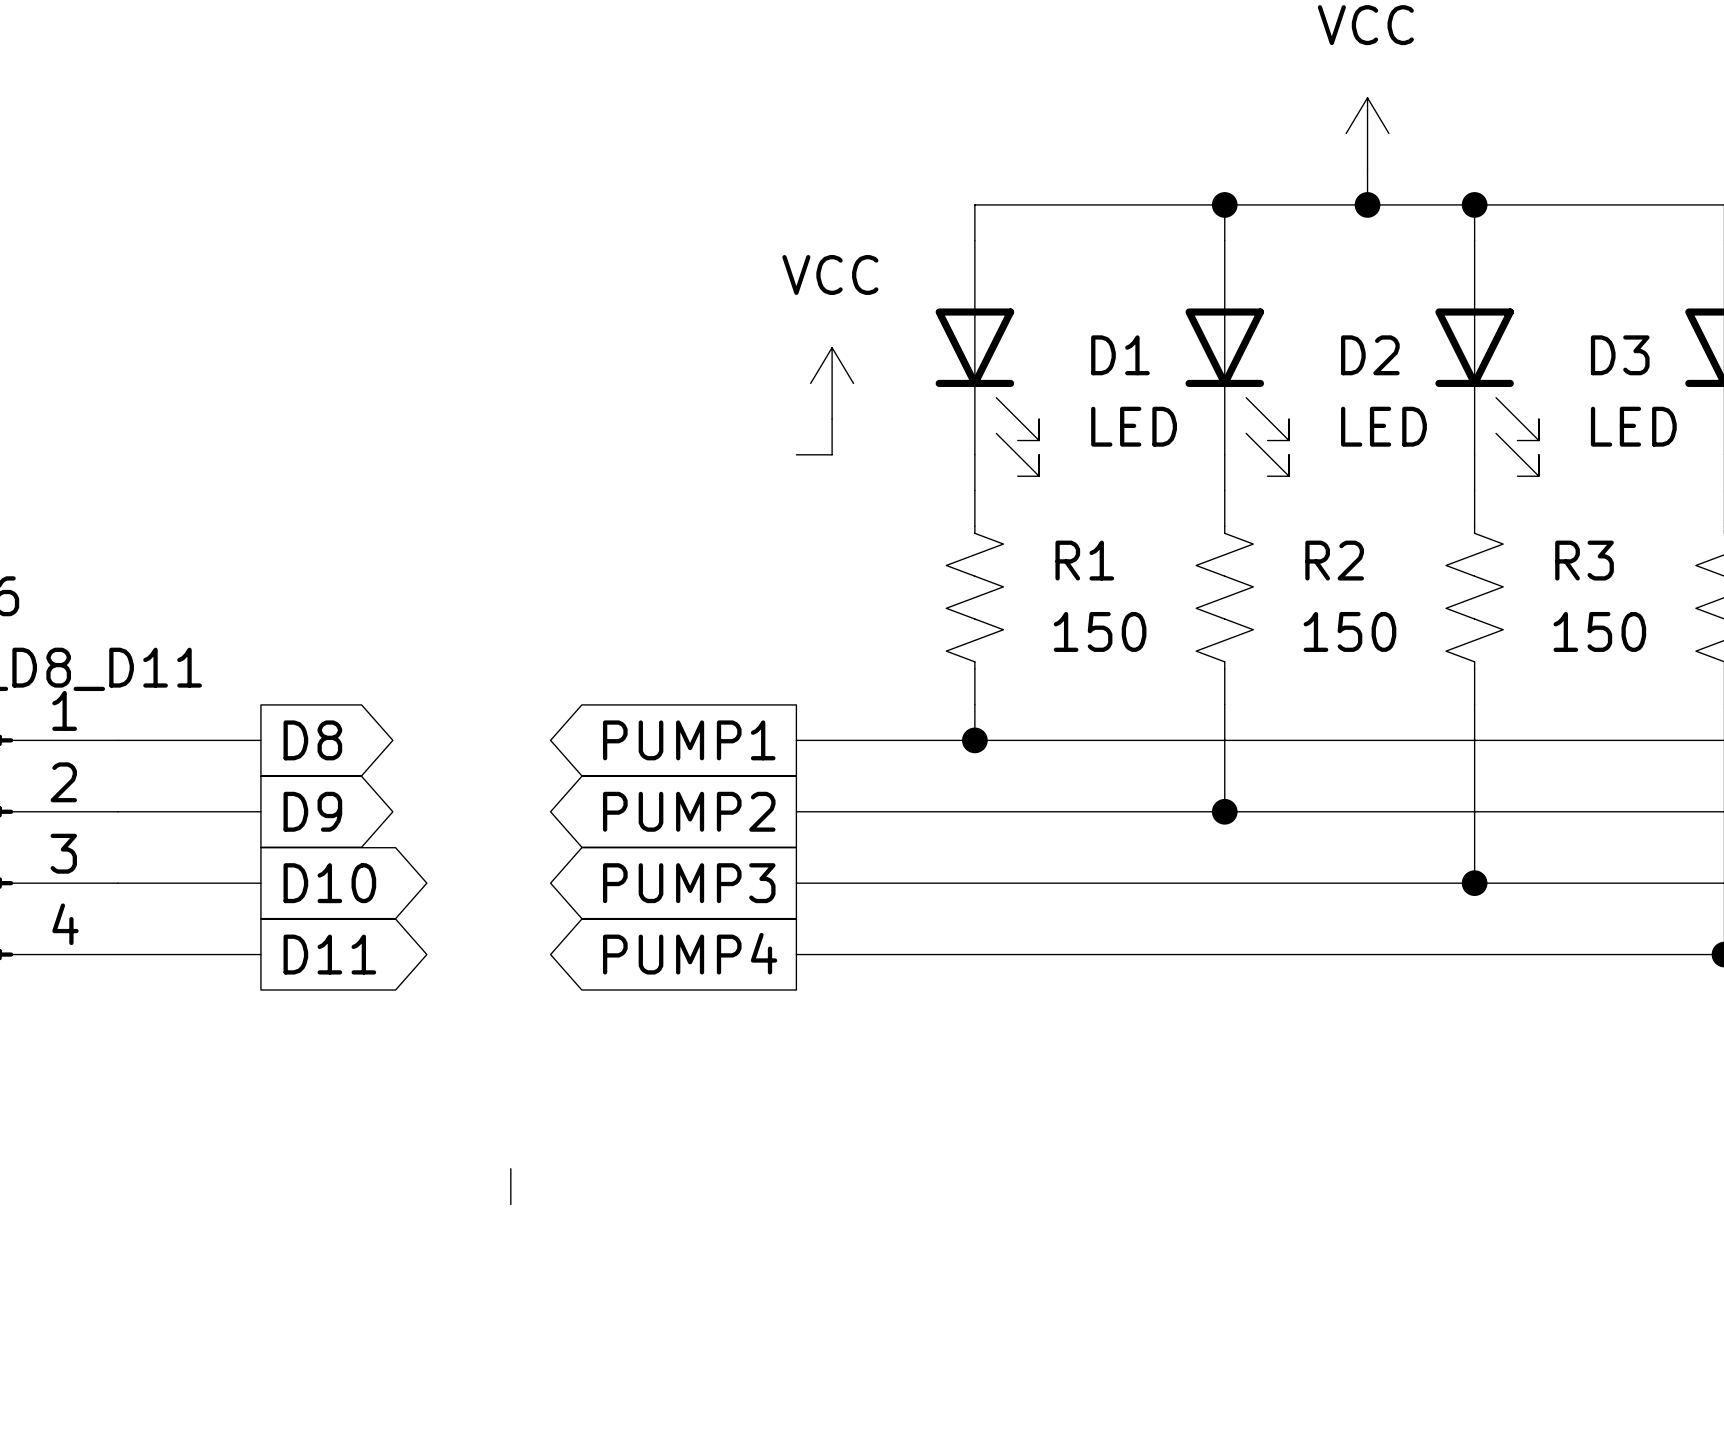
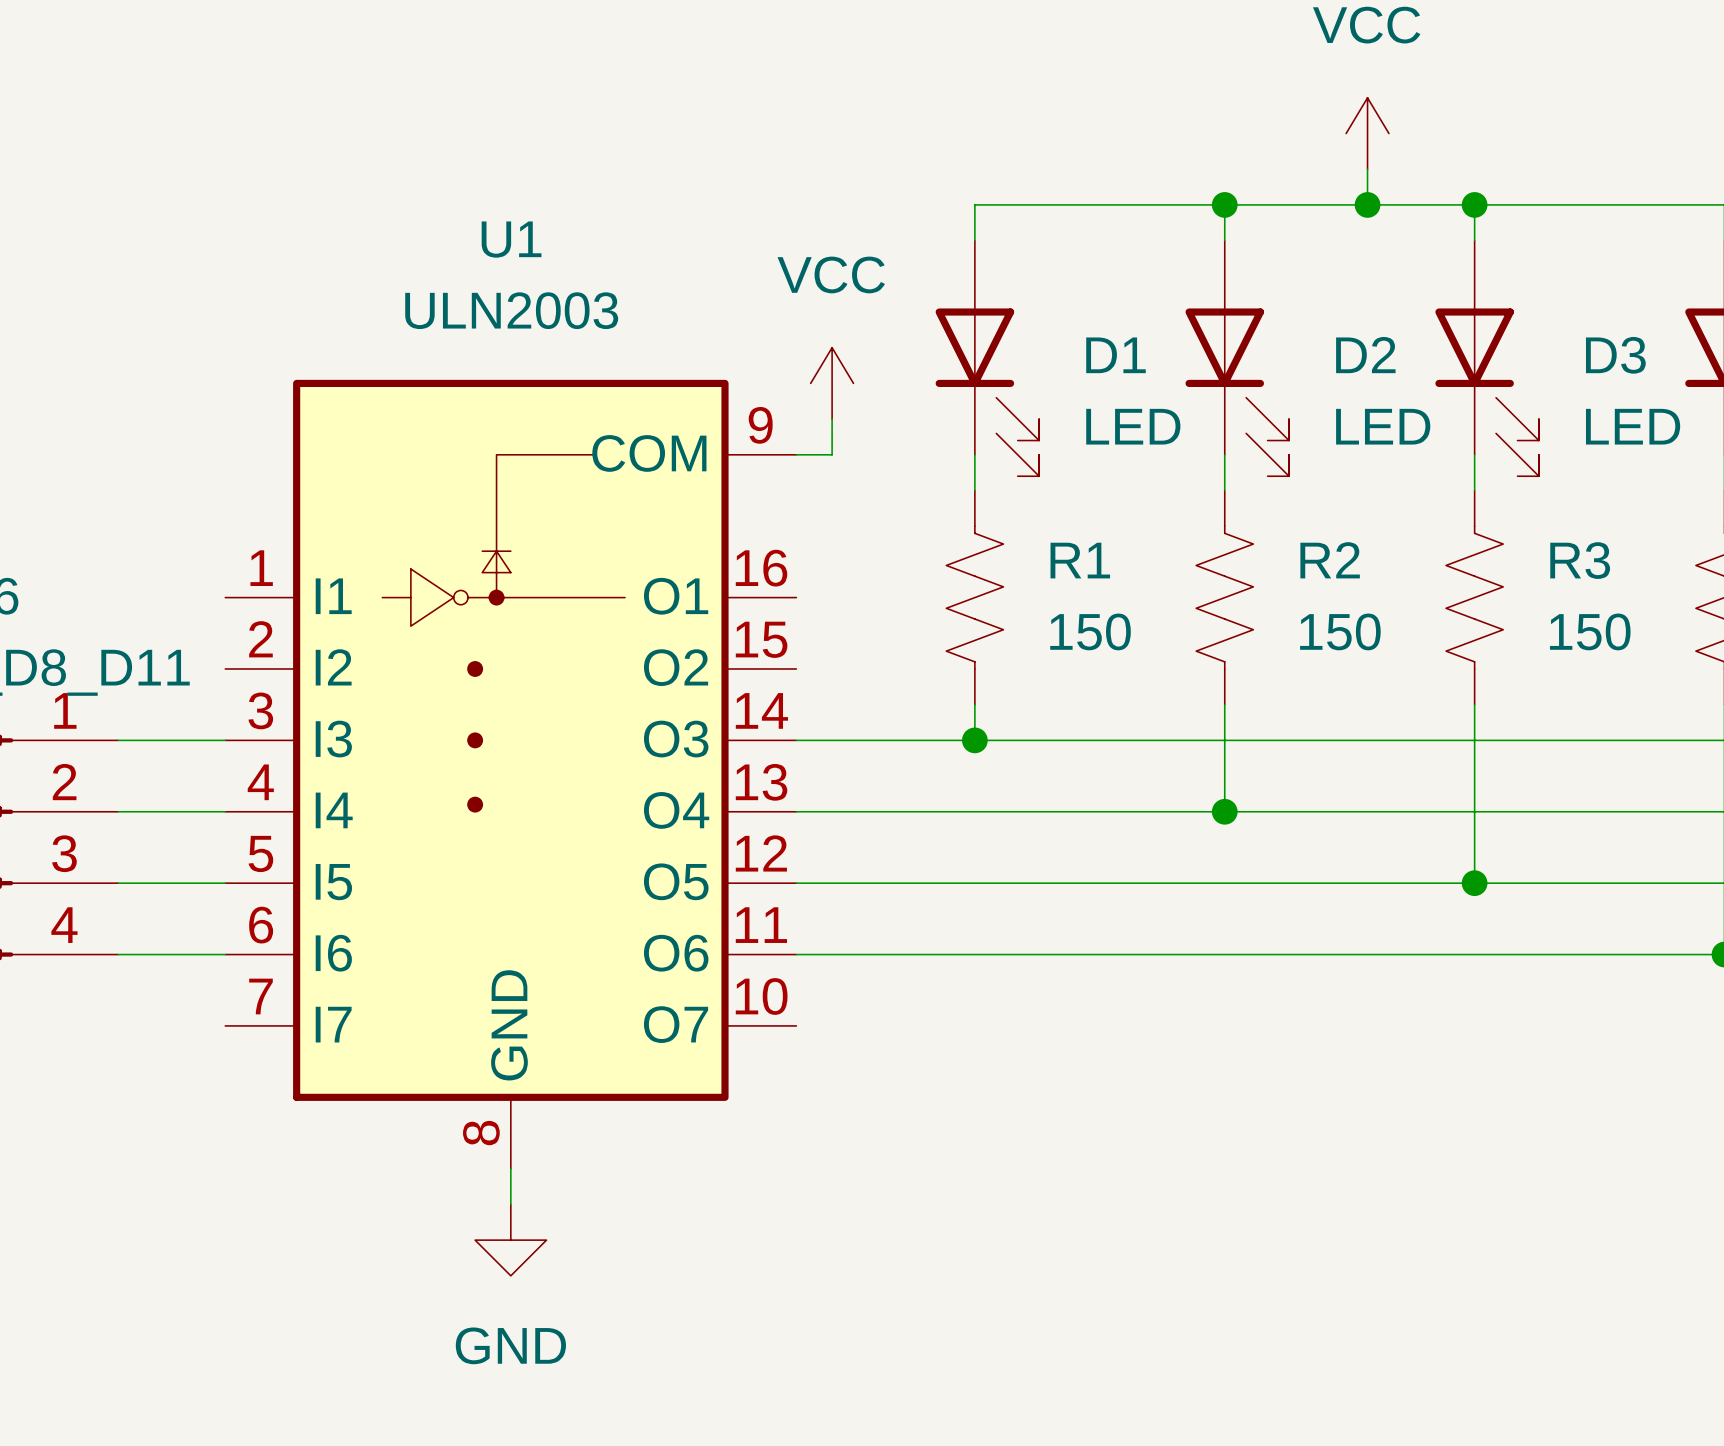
global label: D8 (312, 740) -> none
global label: PUMP1 (689, 740) -> none
U1: none -> ULN2003 (510, 774)
global label: D9 (312, 811) -> none
global label: PUMP2 (689, 811) -> none
global label: D10 (329, 883) -> none
global label: PUMP3 (689, 883) -> none
global label: PUMP4 (690, 953) -> none
global label: D11 (329, 954) -> none
power symbol: none -> GND (510, 1240)

